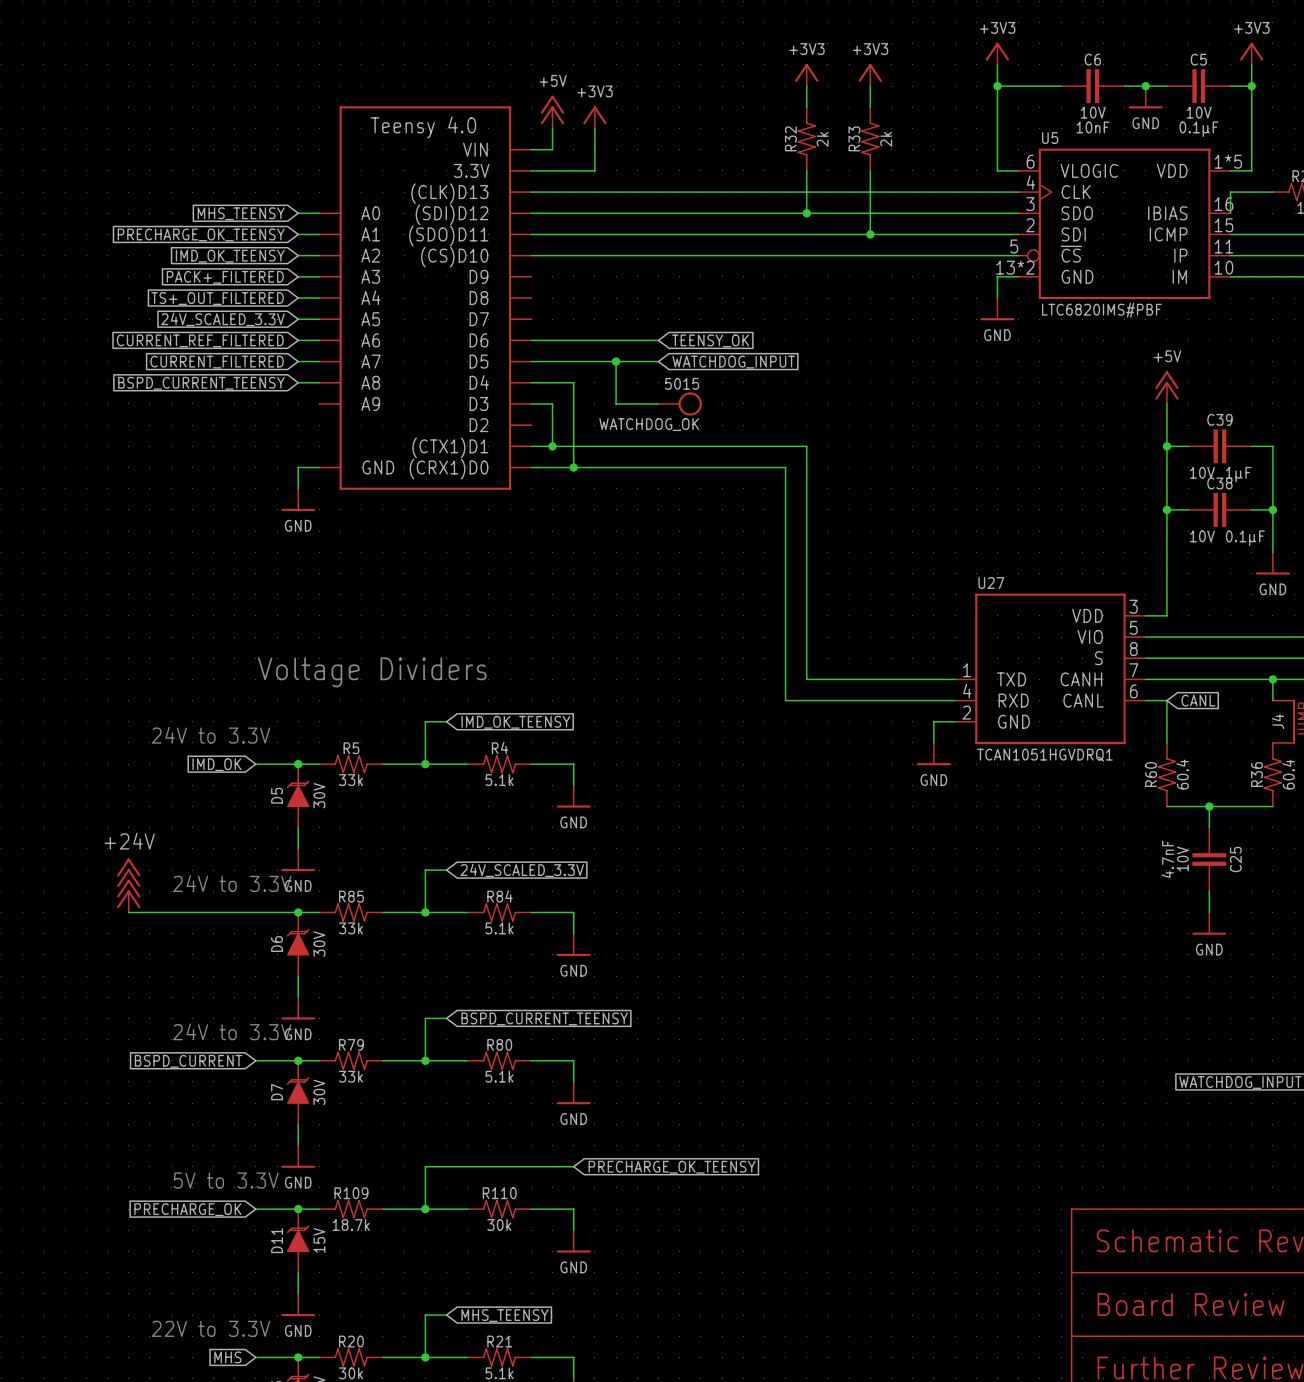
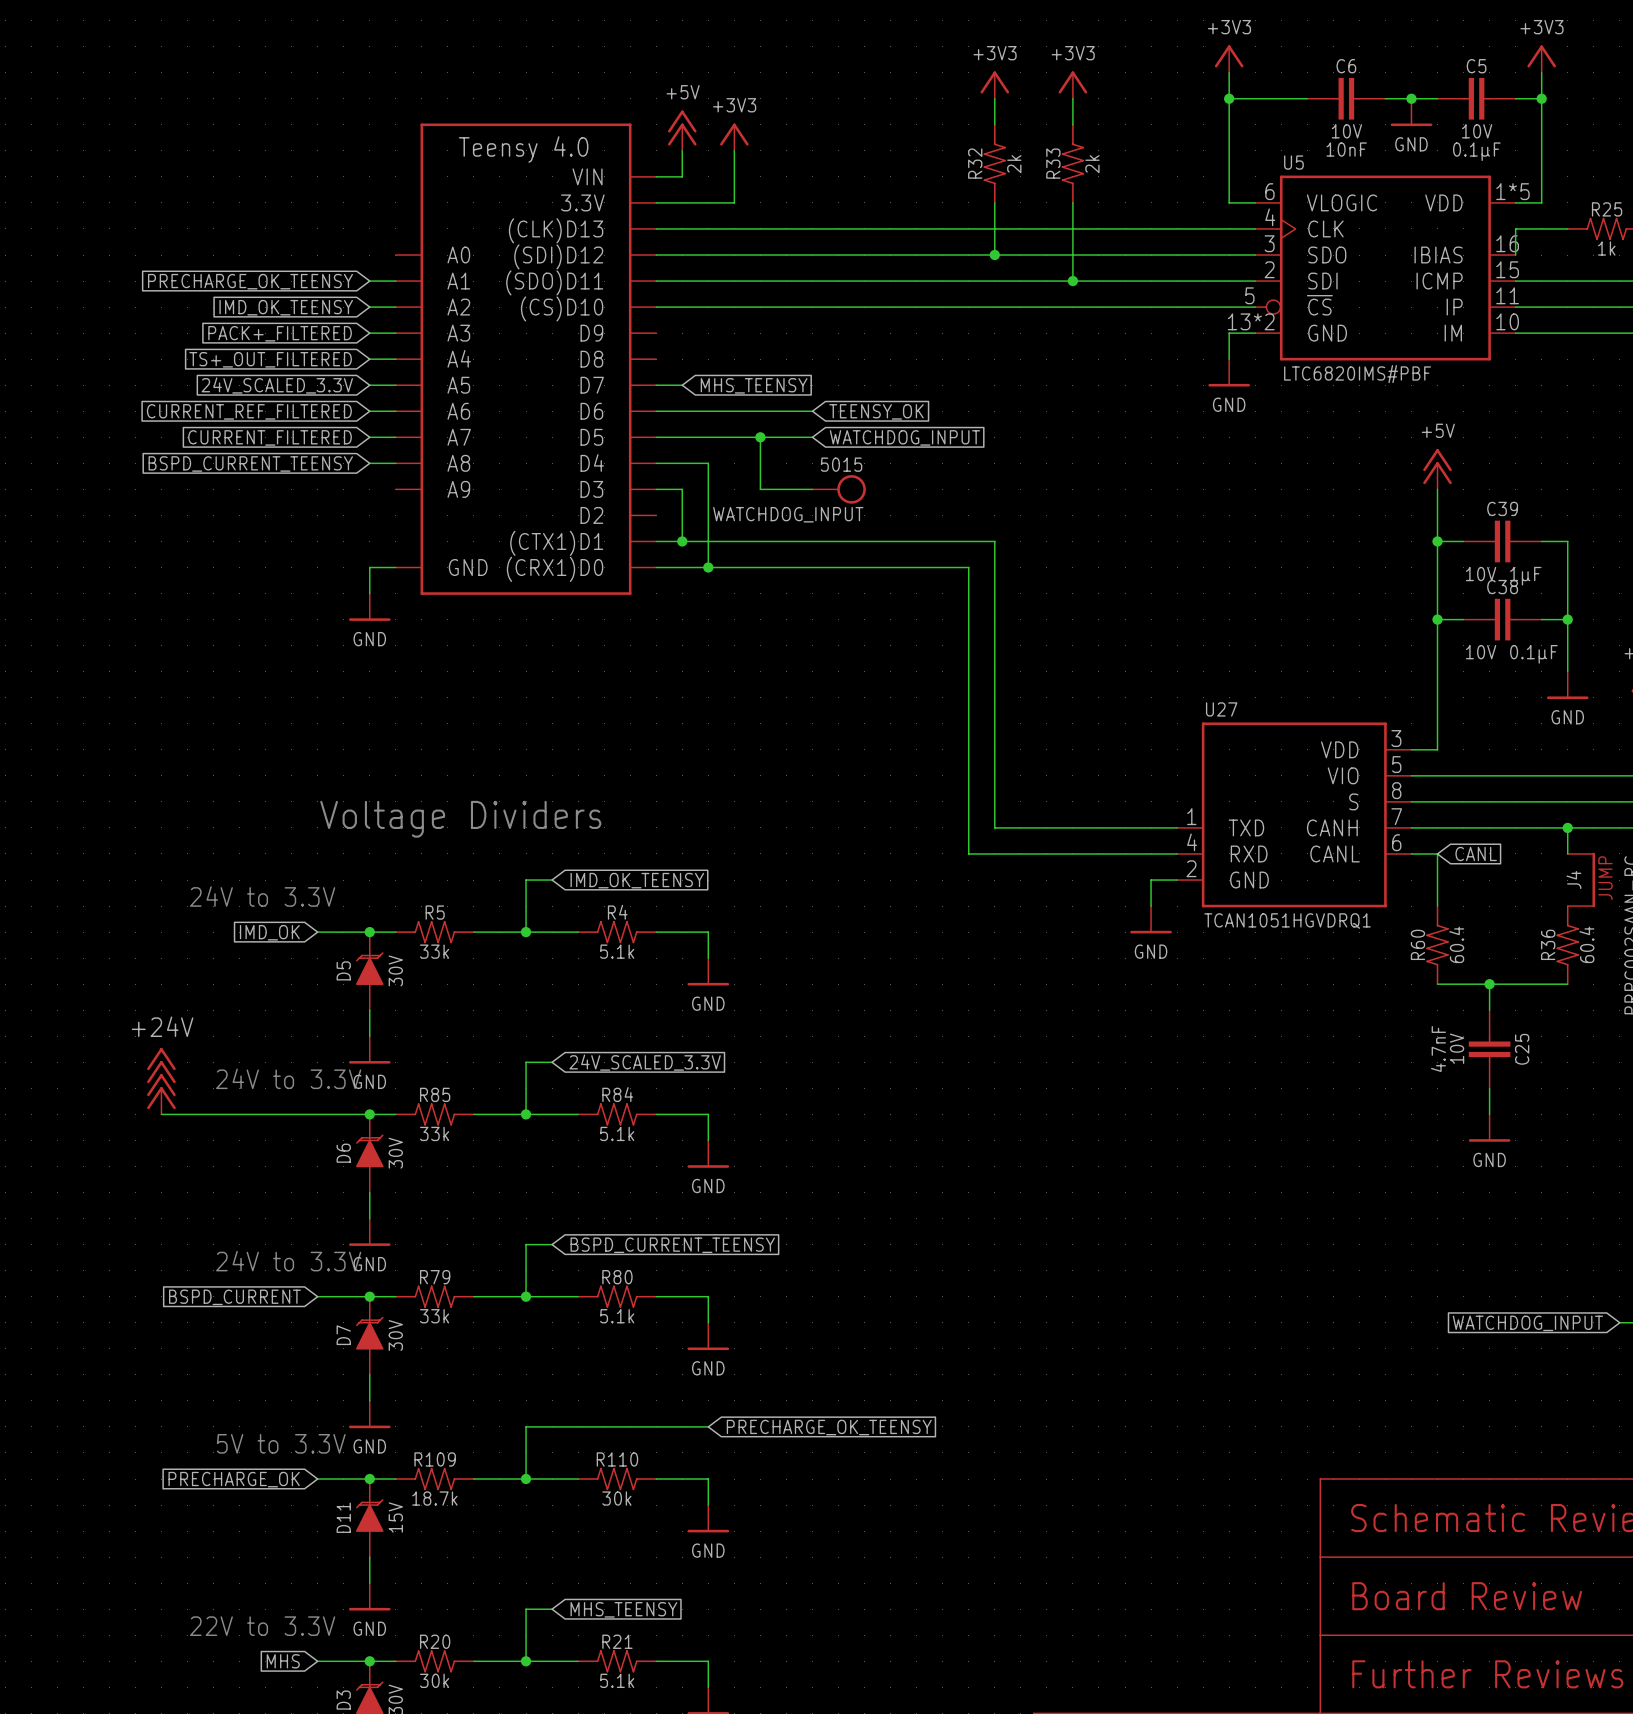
global label: MHS_TEENSY (241, 213) -> none
wire: (298, 213) (319, 213) -> none
wire: none -> (656, 385) (682, 385)
global label: none -> MHS_TEENSY (754, 385)
WATCHDOG_OK name: WATCHDOG_OK (649, 424) -> WATCHDOG_INPUT (788, 514)

